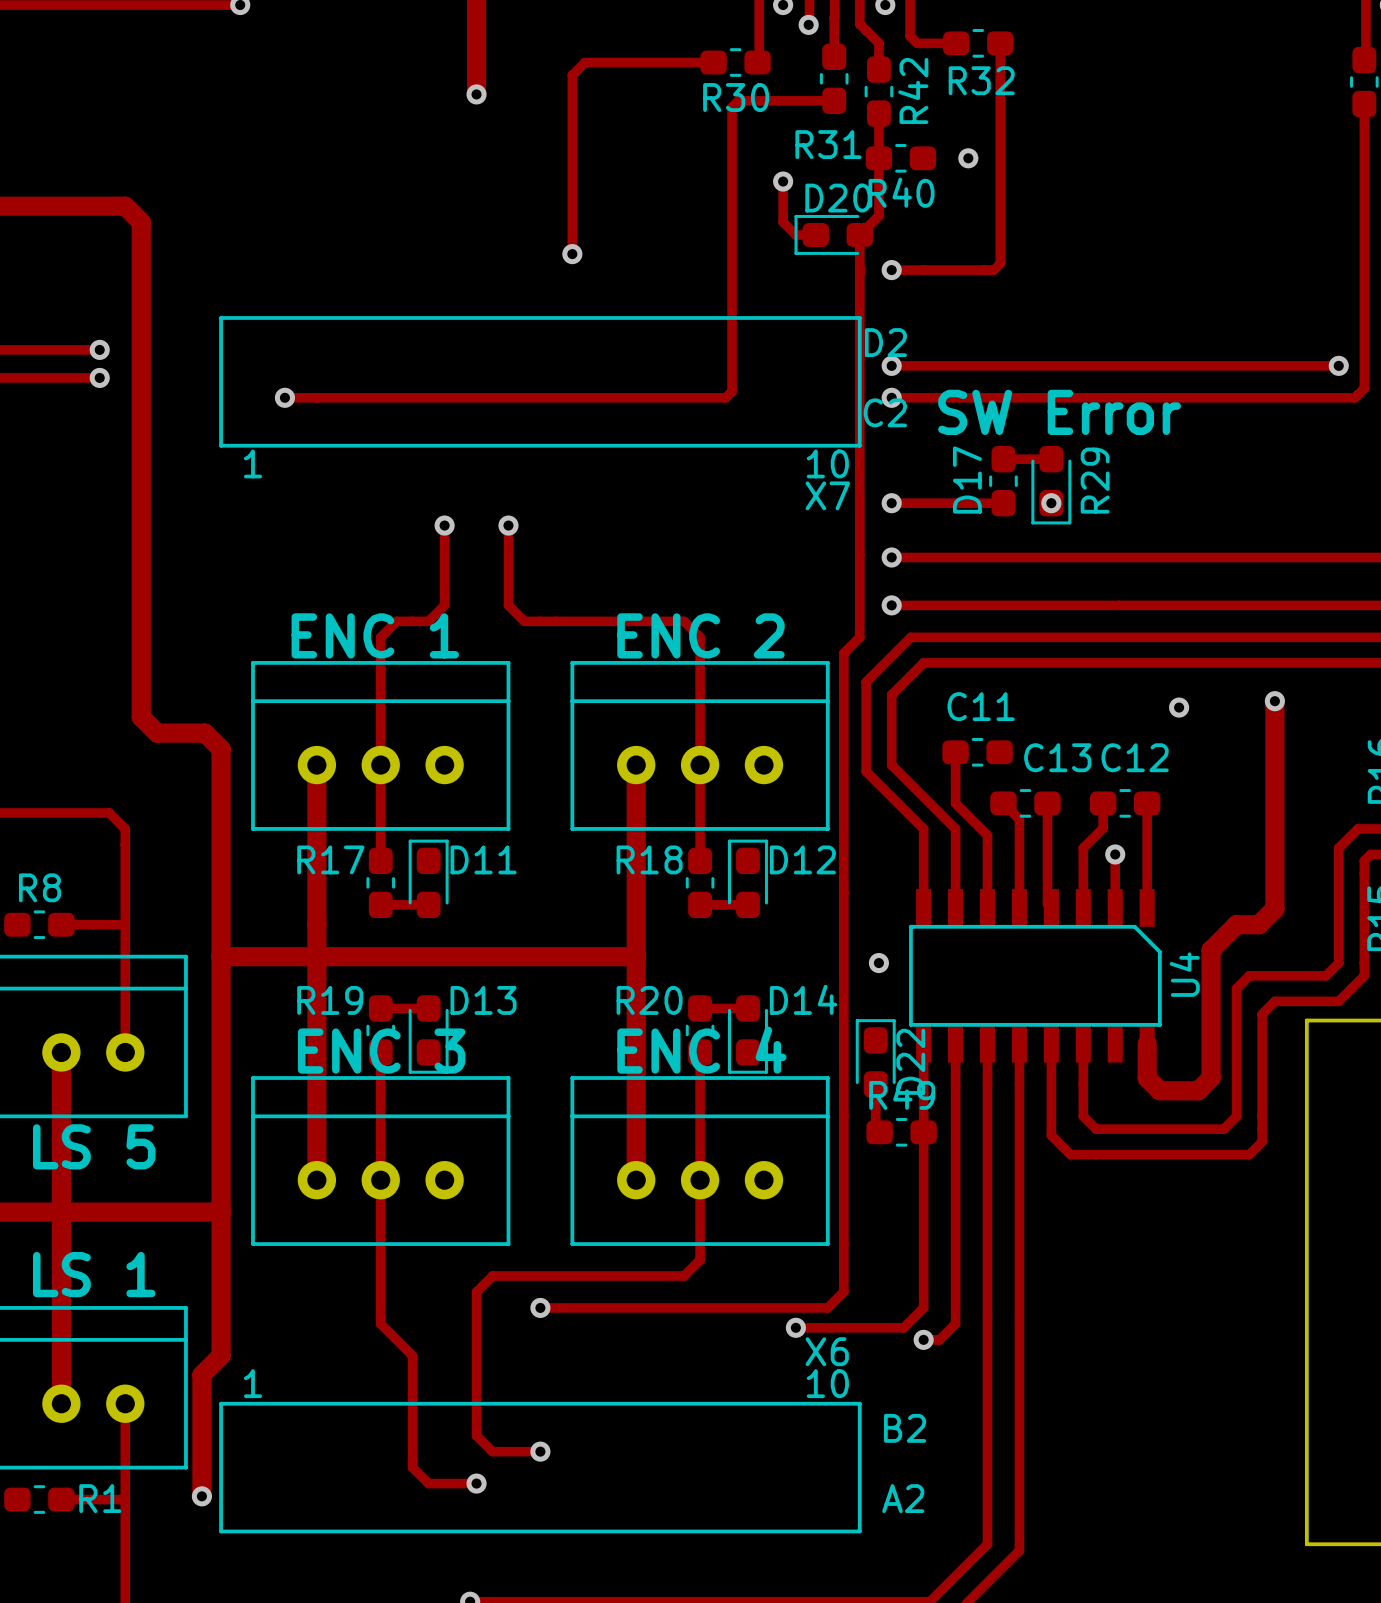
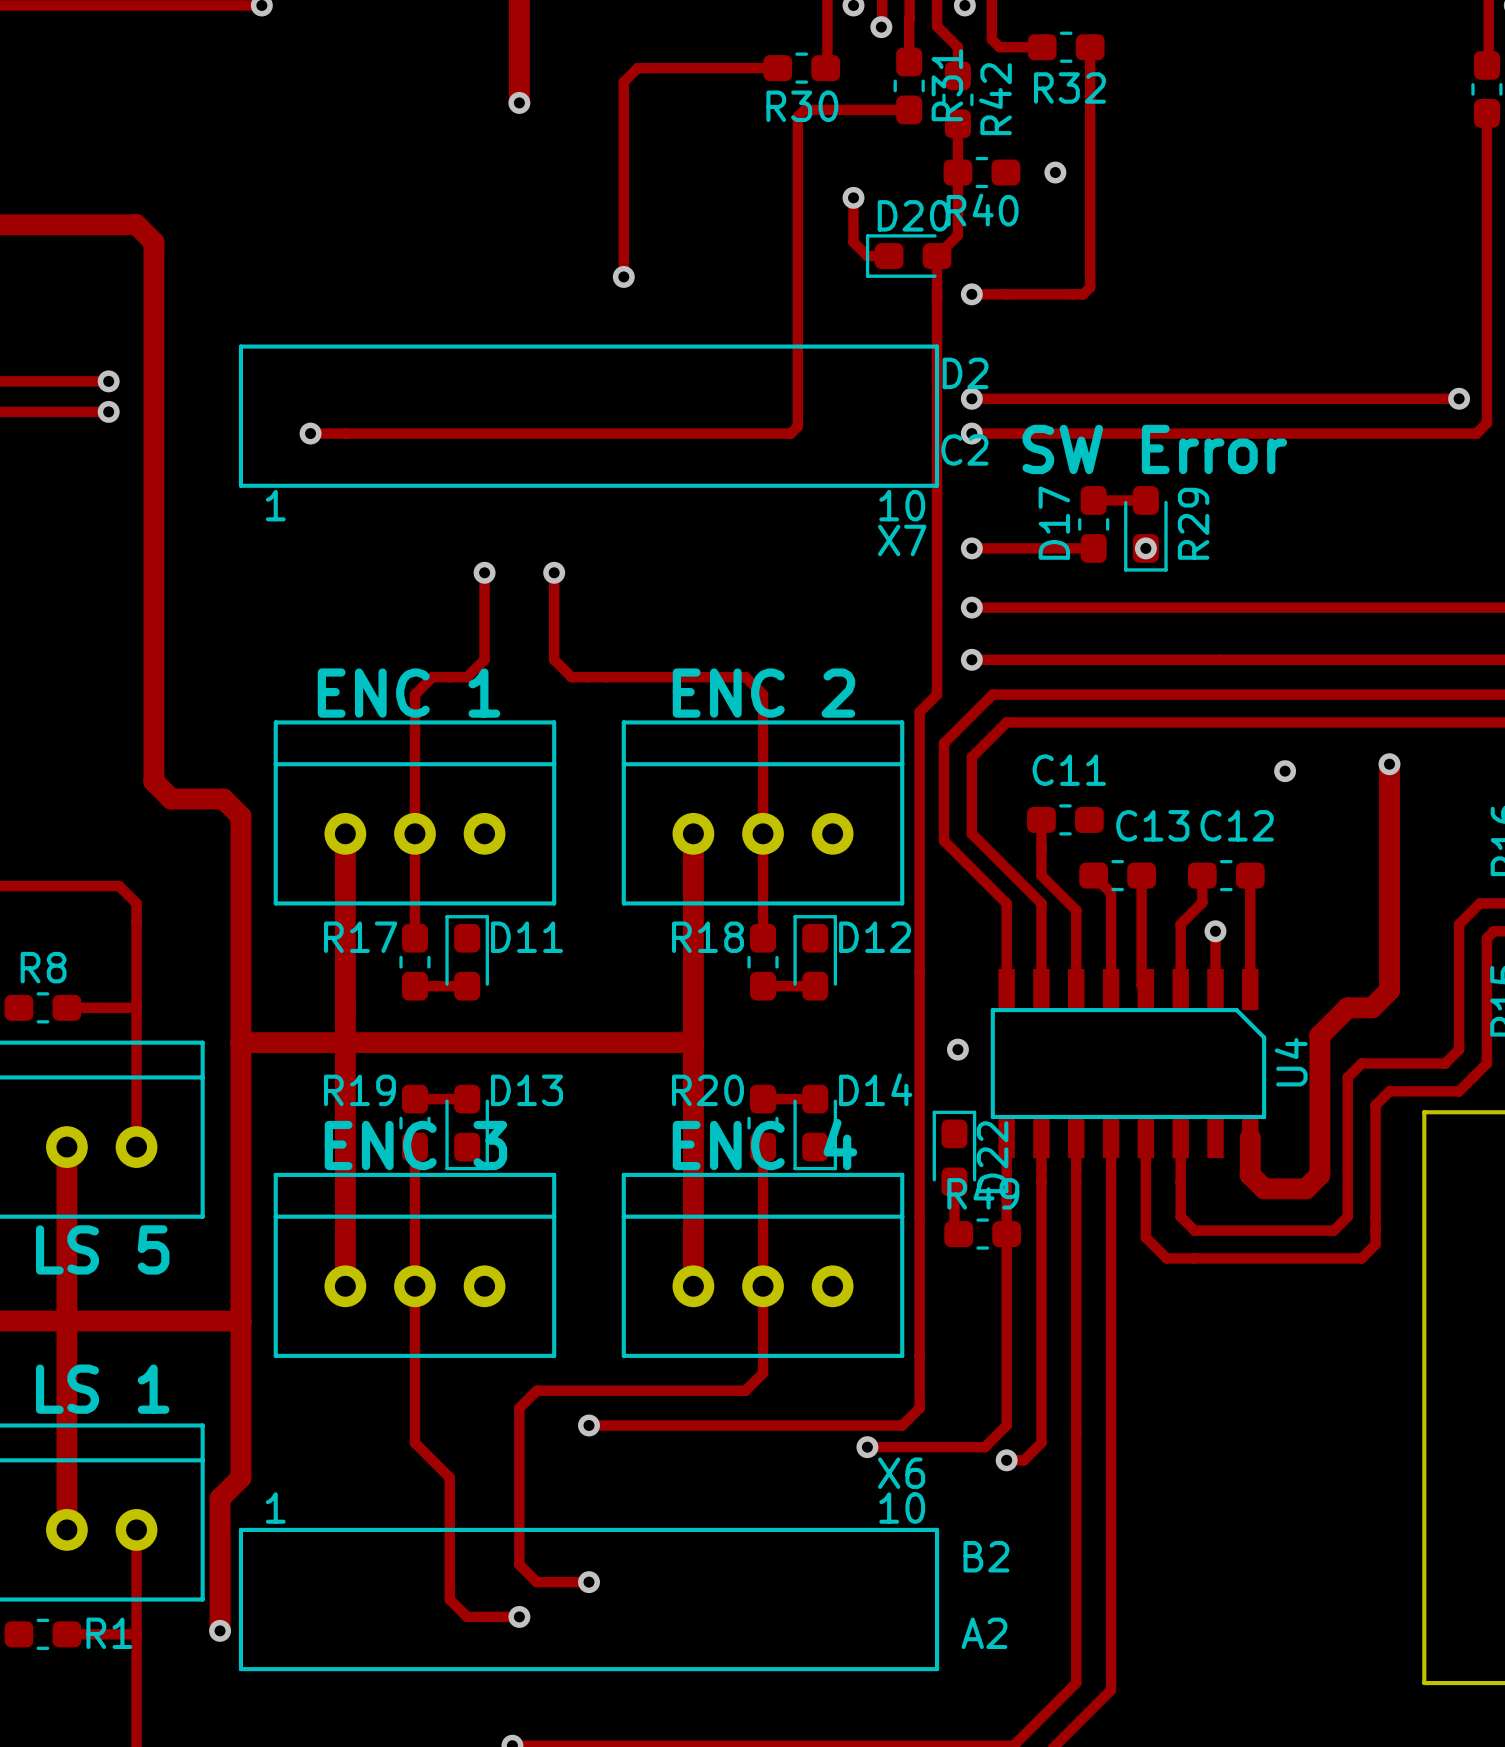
R31 name rotation: 0° (828, 144) -> 90° counterclockwise (947, 85)

